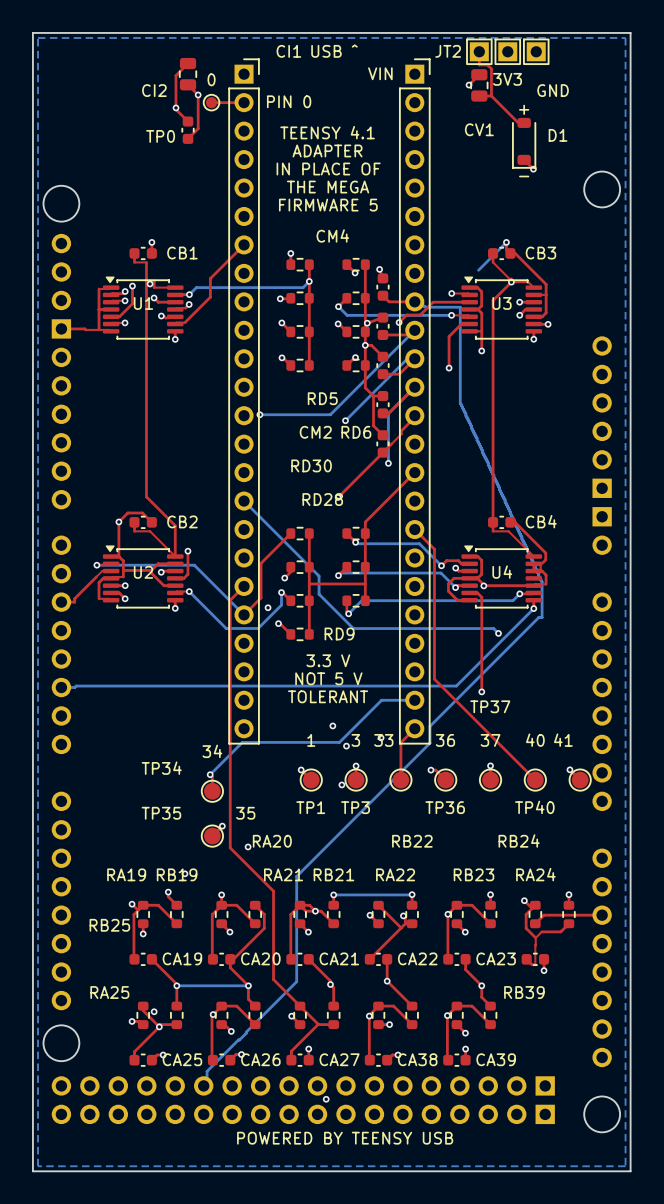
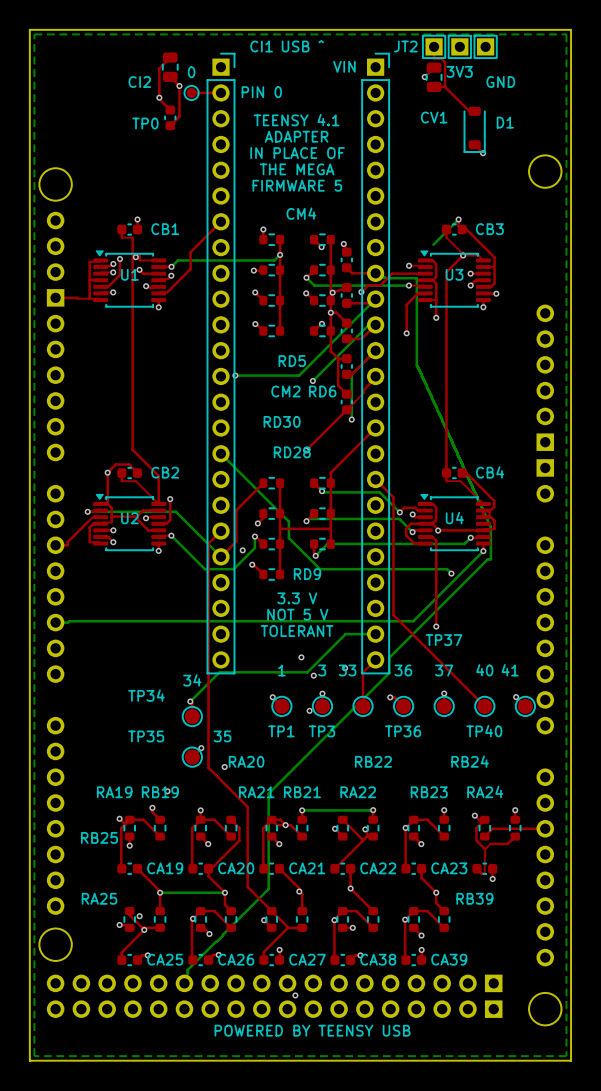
D1 text: + (524, 109) -> none
D1 text: - (524, 176) -> none

